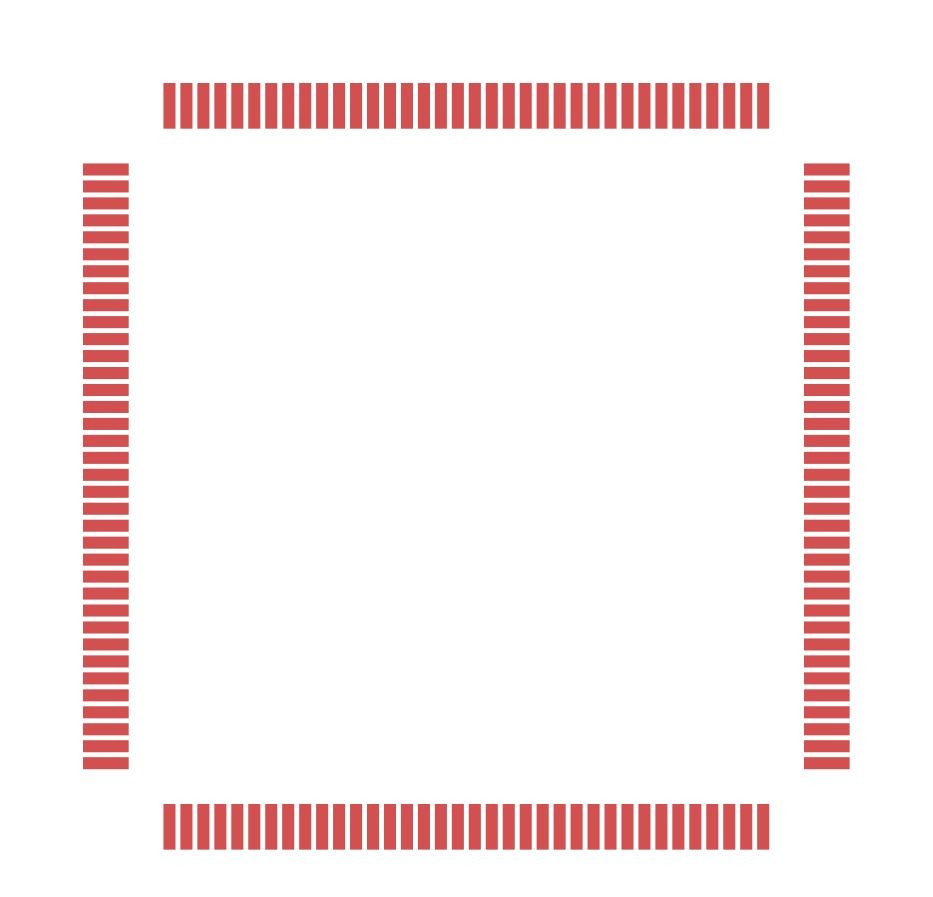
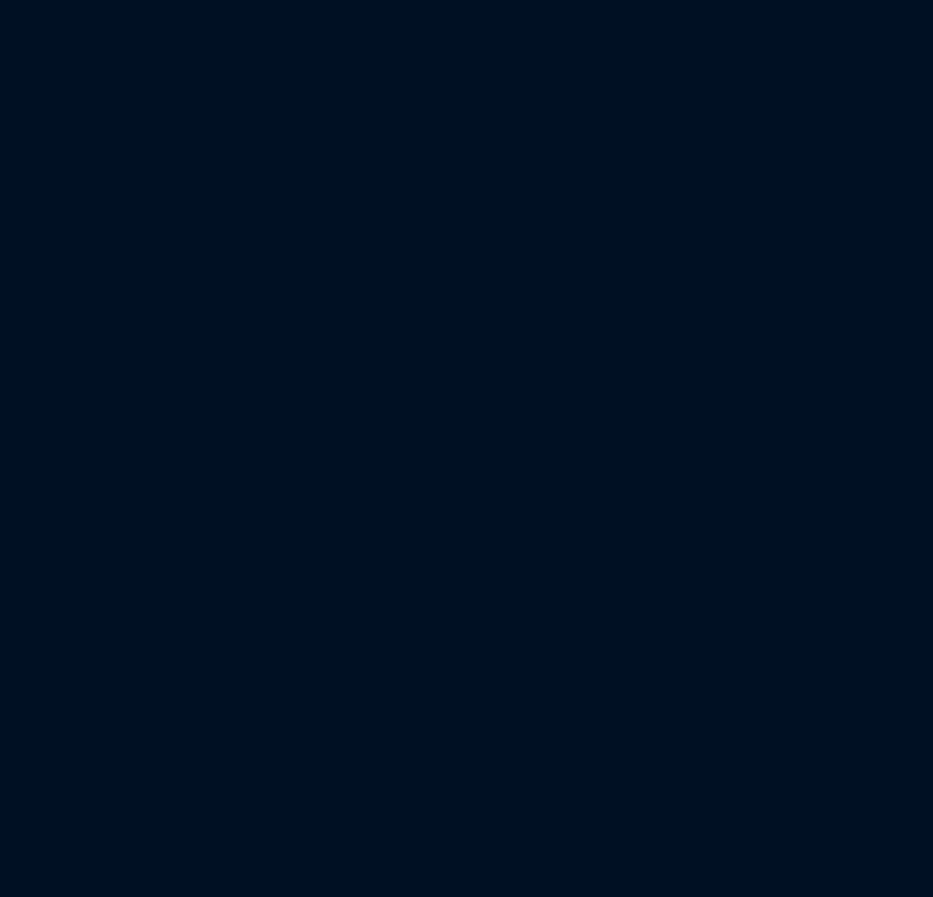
part: (466, 466) -> none

